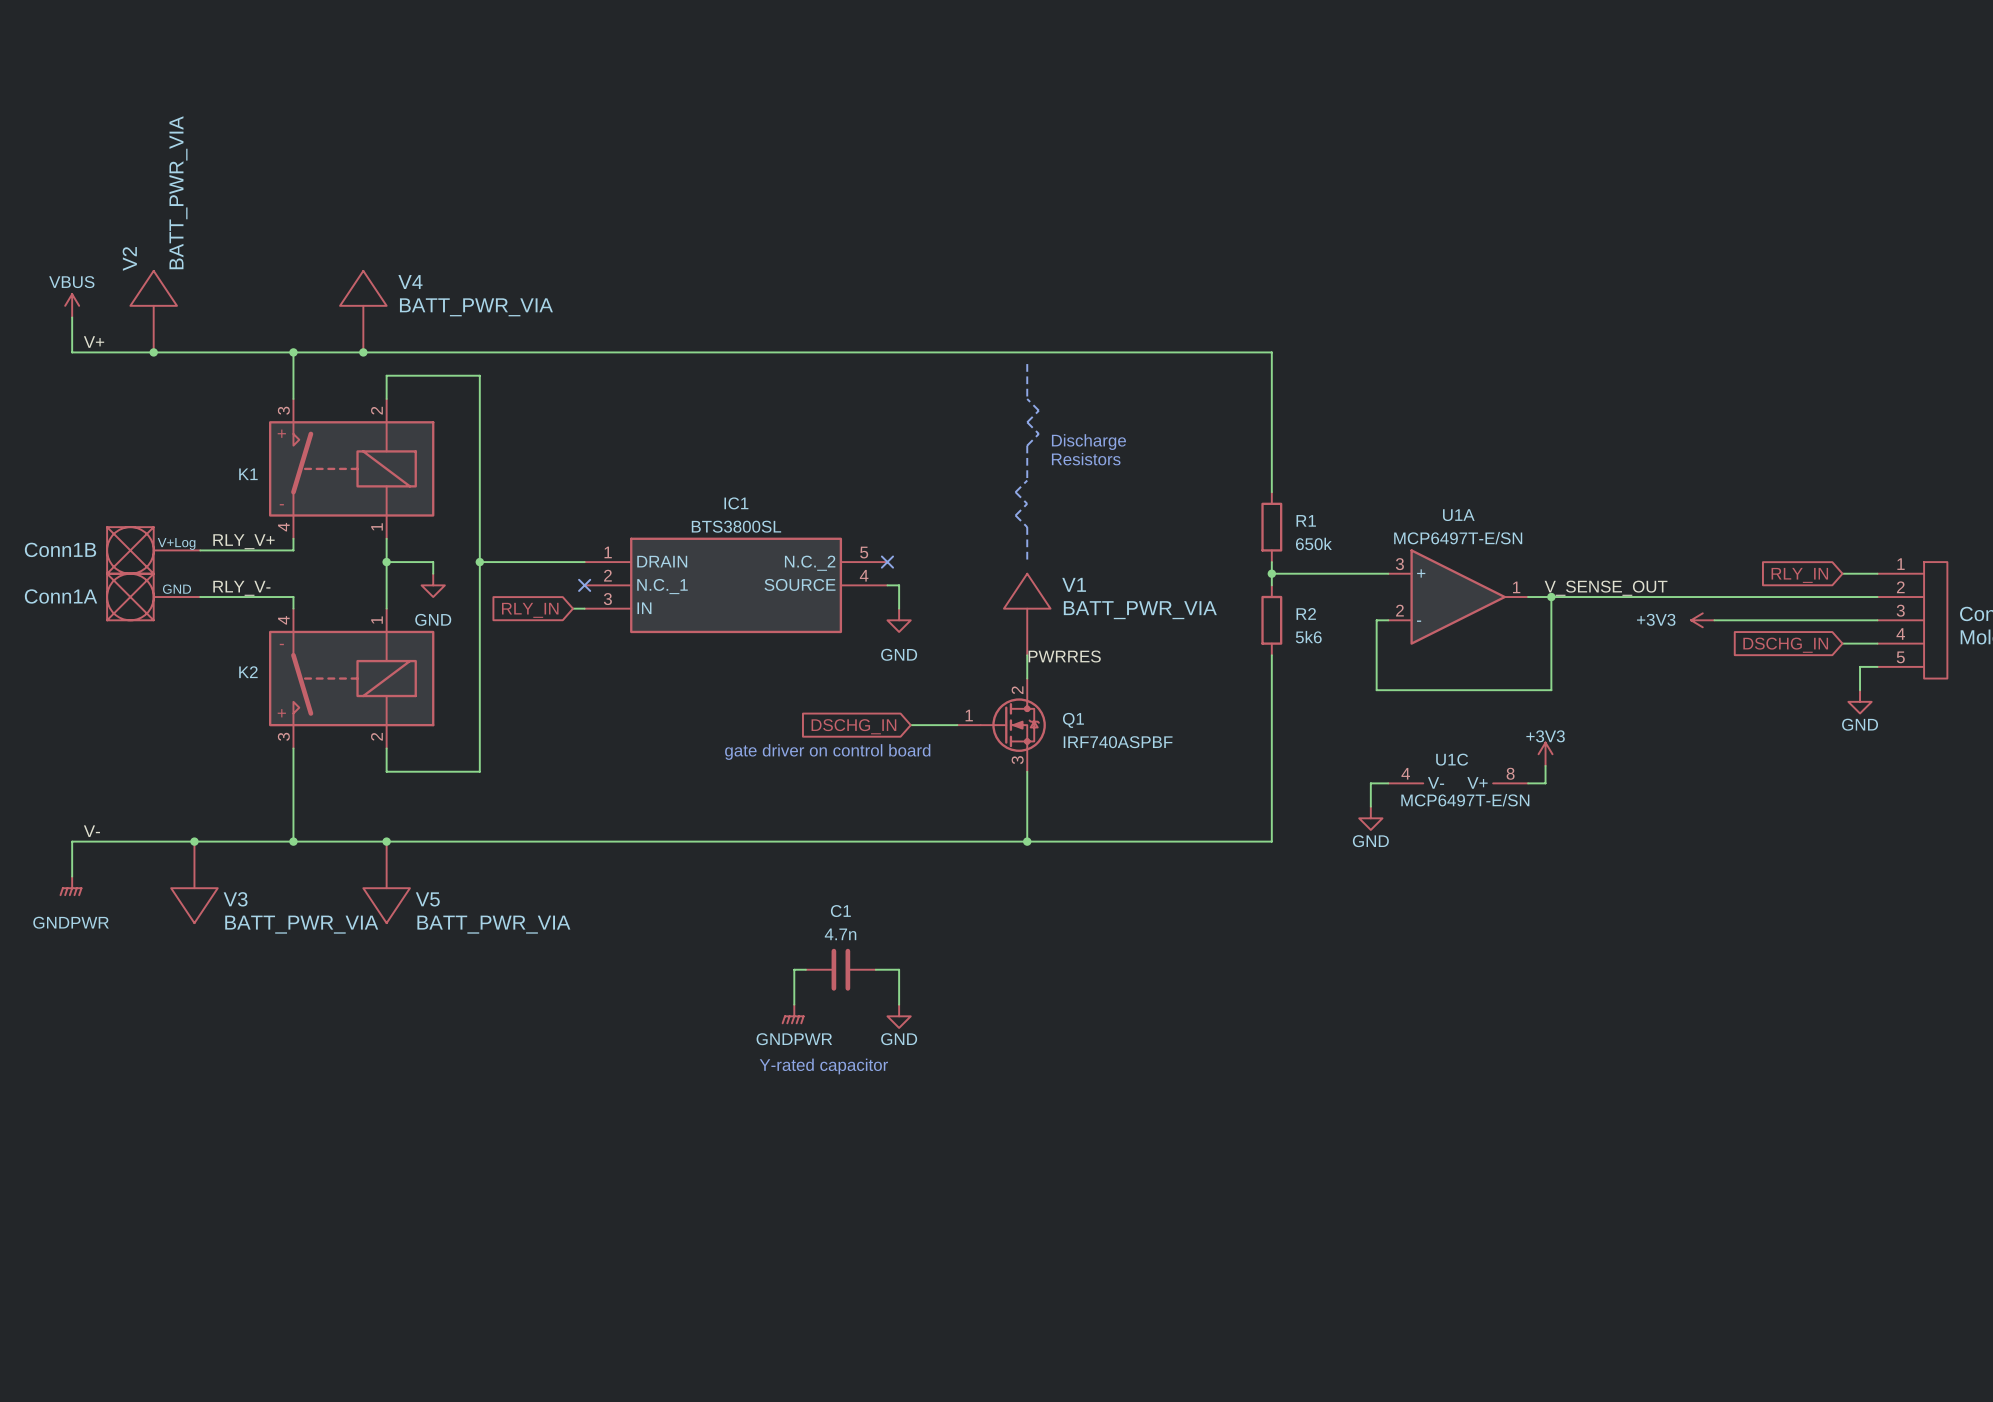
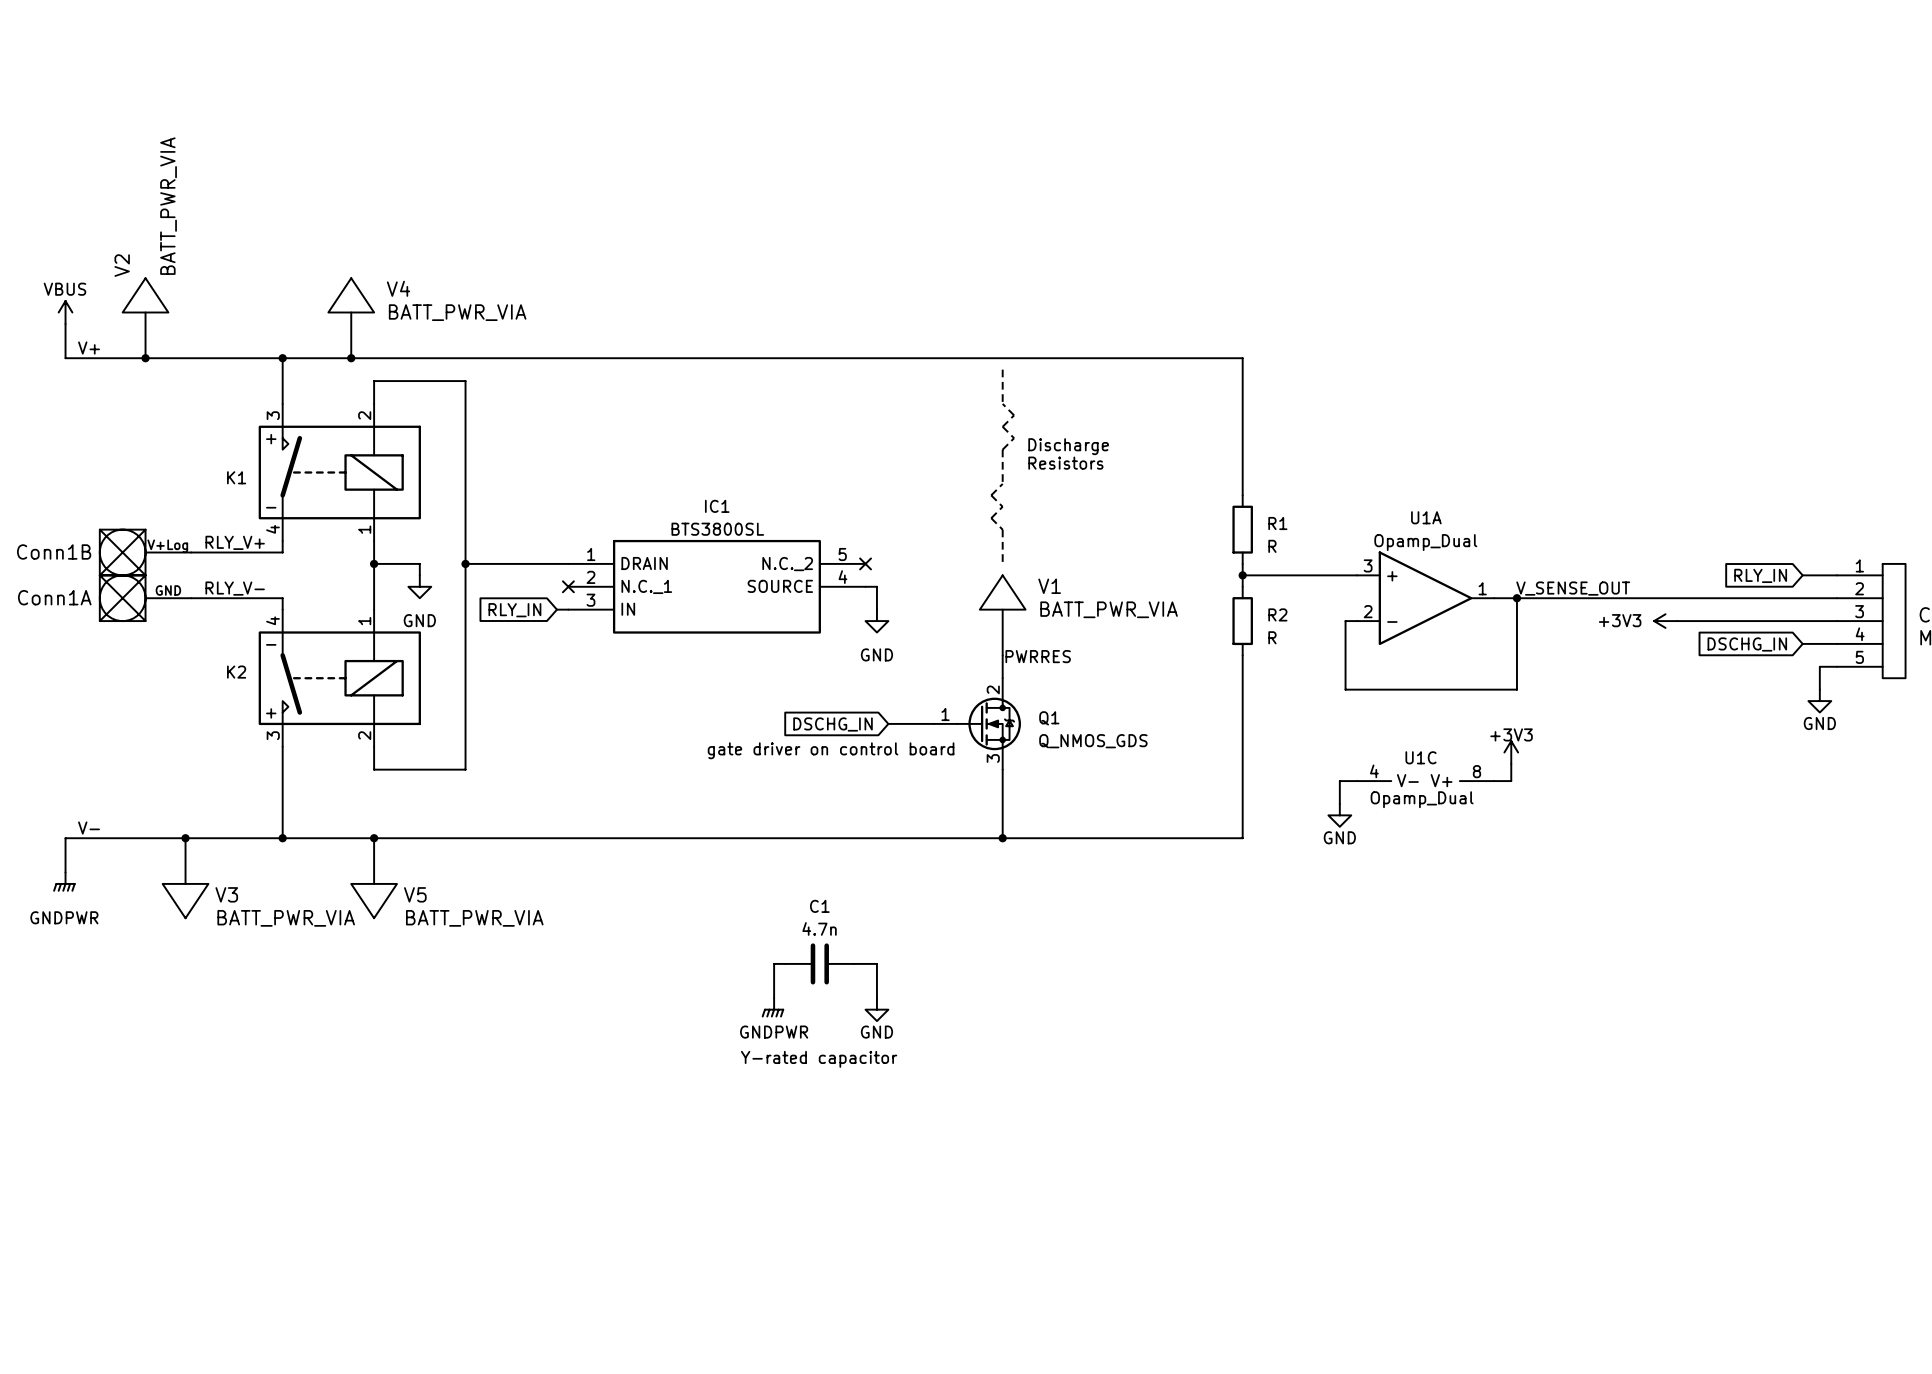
U1A value: MCP6497T-E/SN (1458, 538) -> Opamp_Dual (1425, 542)
R1 value: 650k (1313, 543) -> R (1272, 546)
R2 value: 5k6 (1308, 637) -> R (1272, 637)
Q1 value: IRF740ASPBF (1118, 742) -> Q_NMOS_GDS (1093, 741)
U1C value: MCP6497T-E/SN (1465, 800) -> Opamp_Dual (1422, 799)

